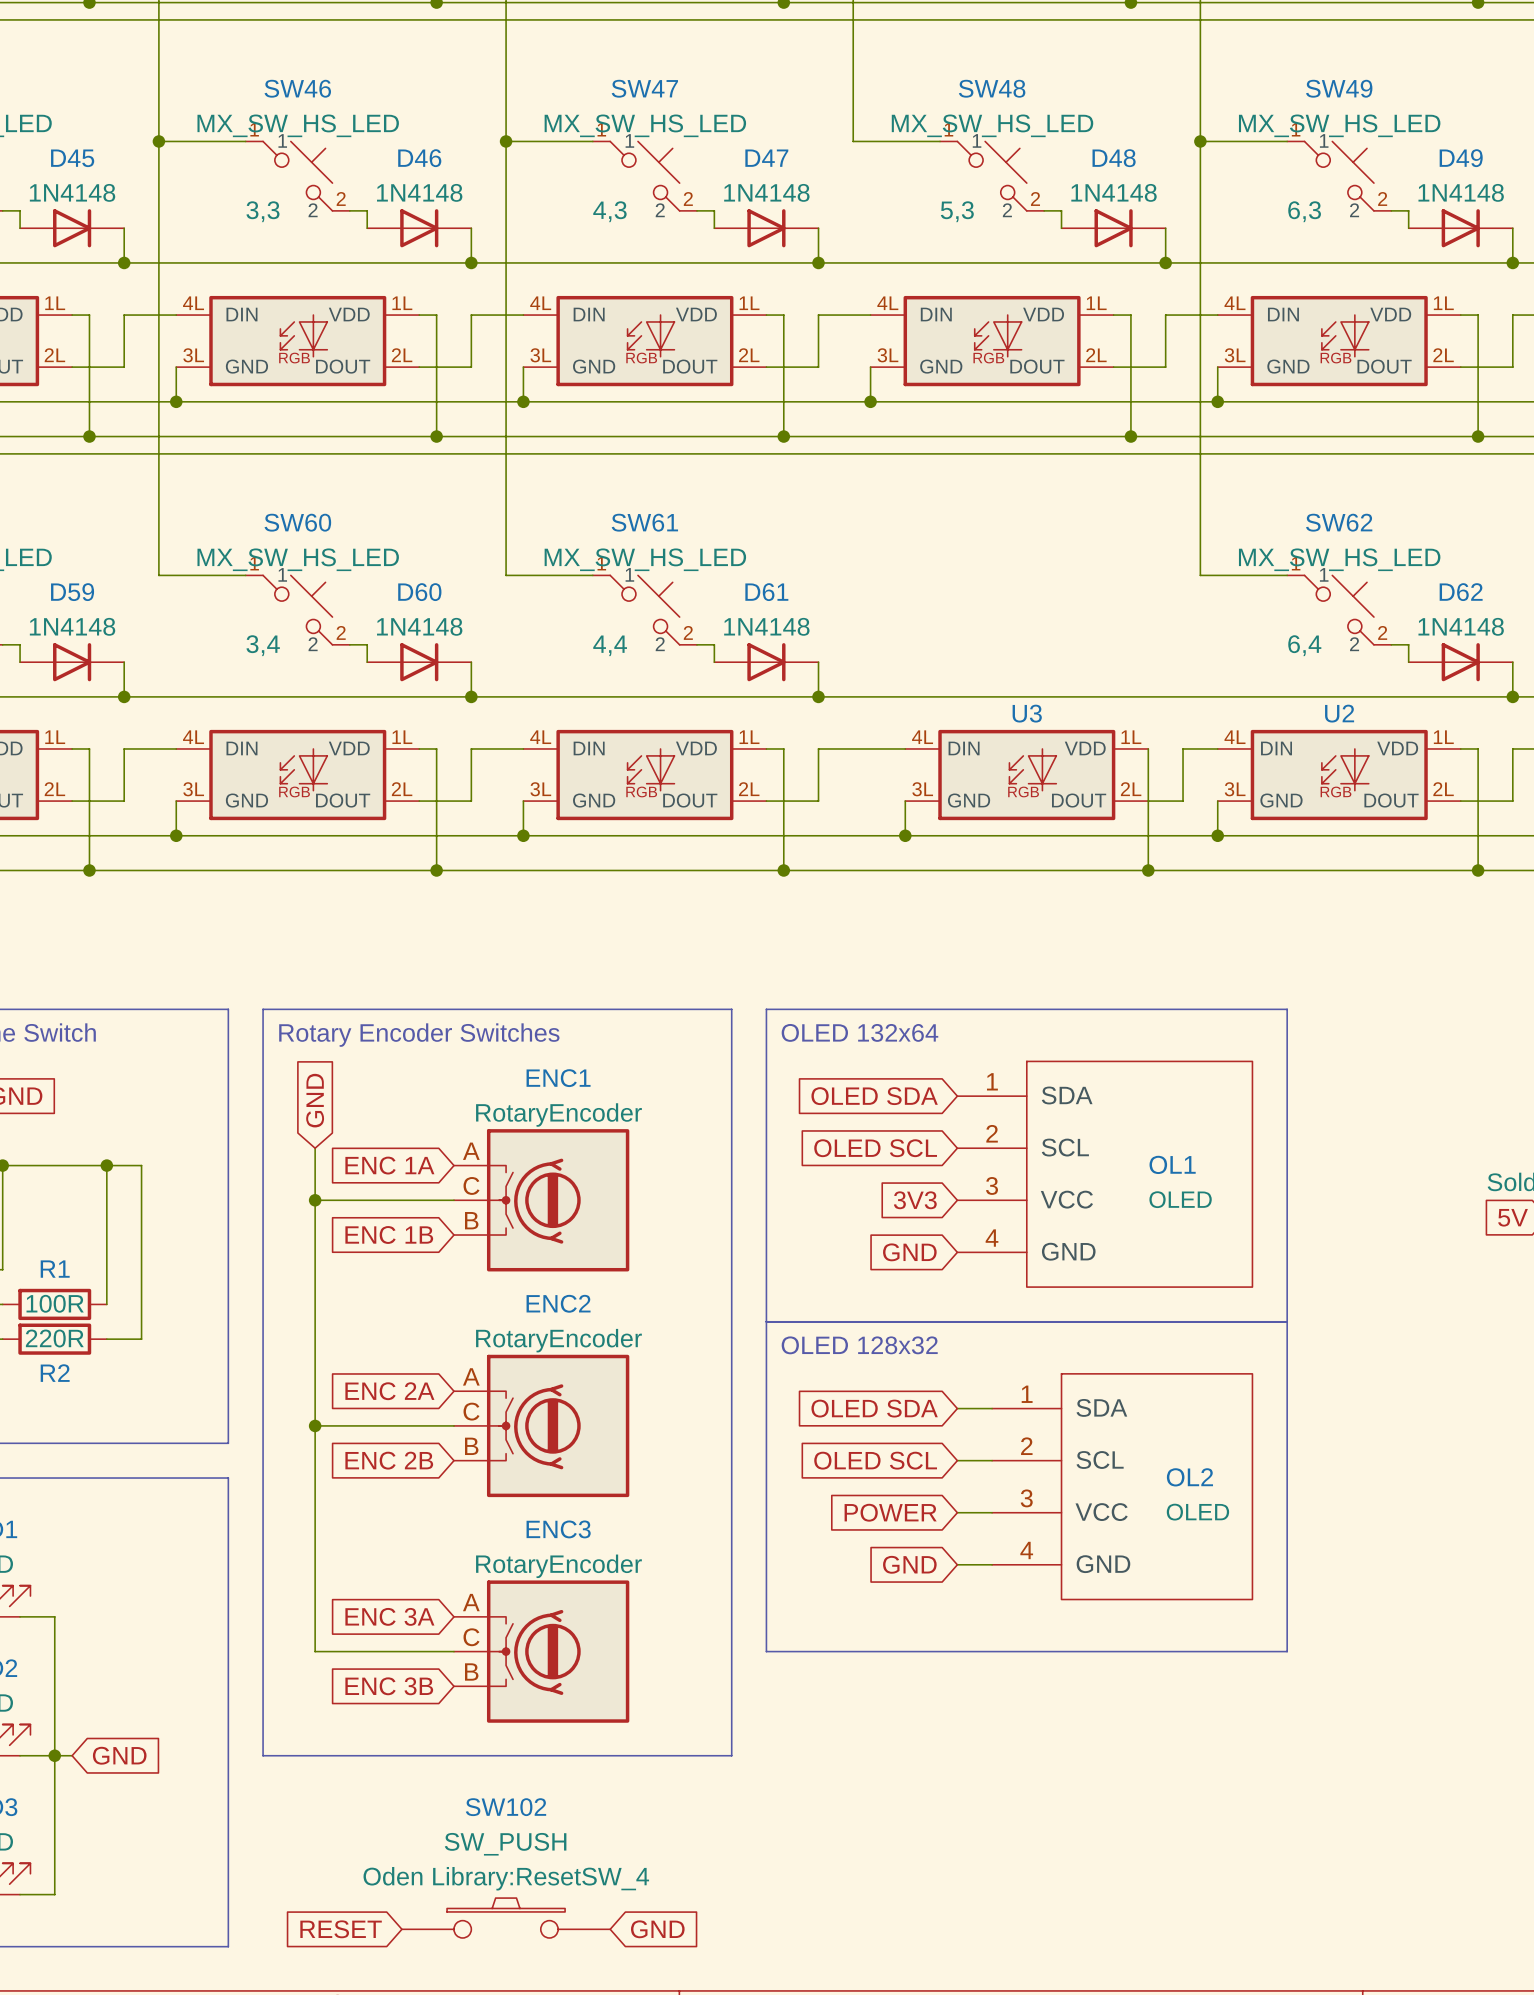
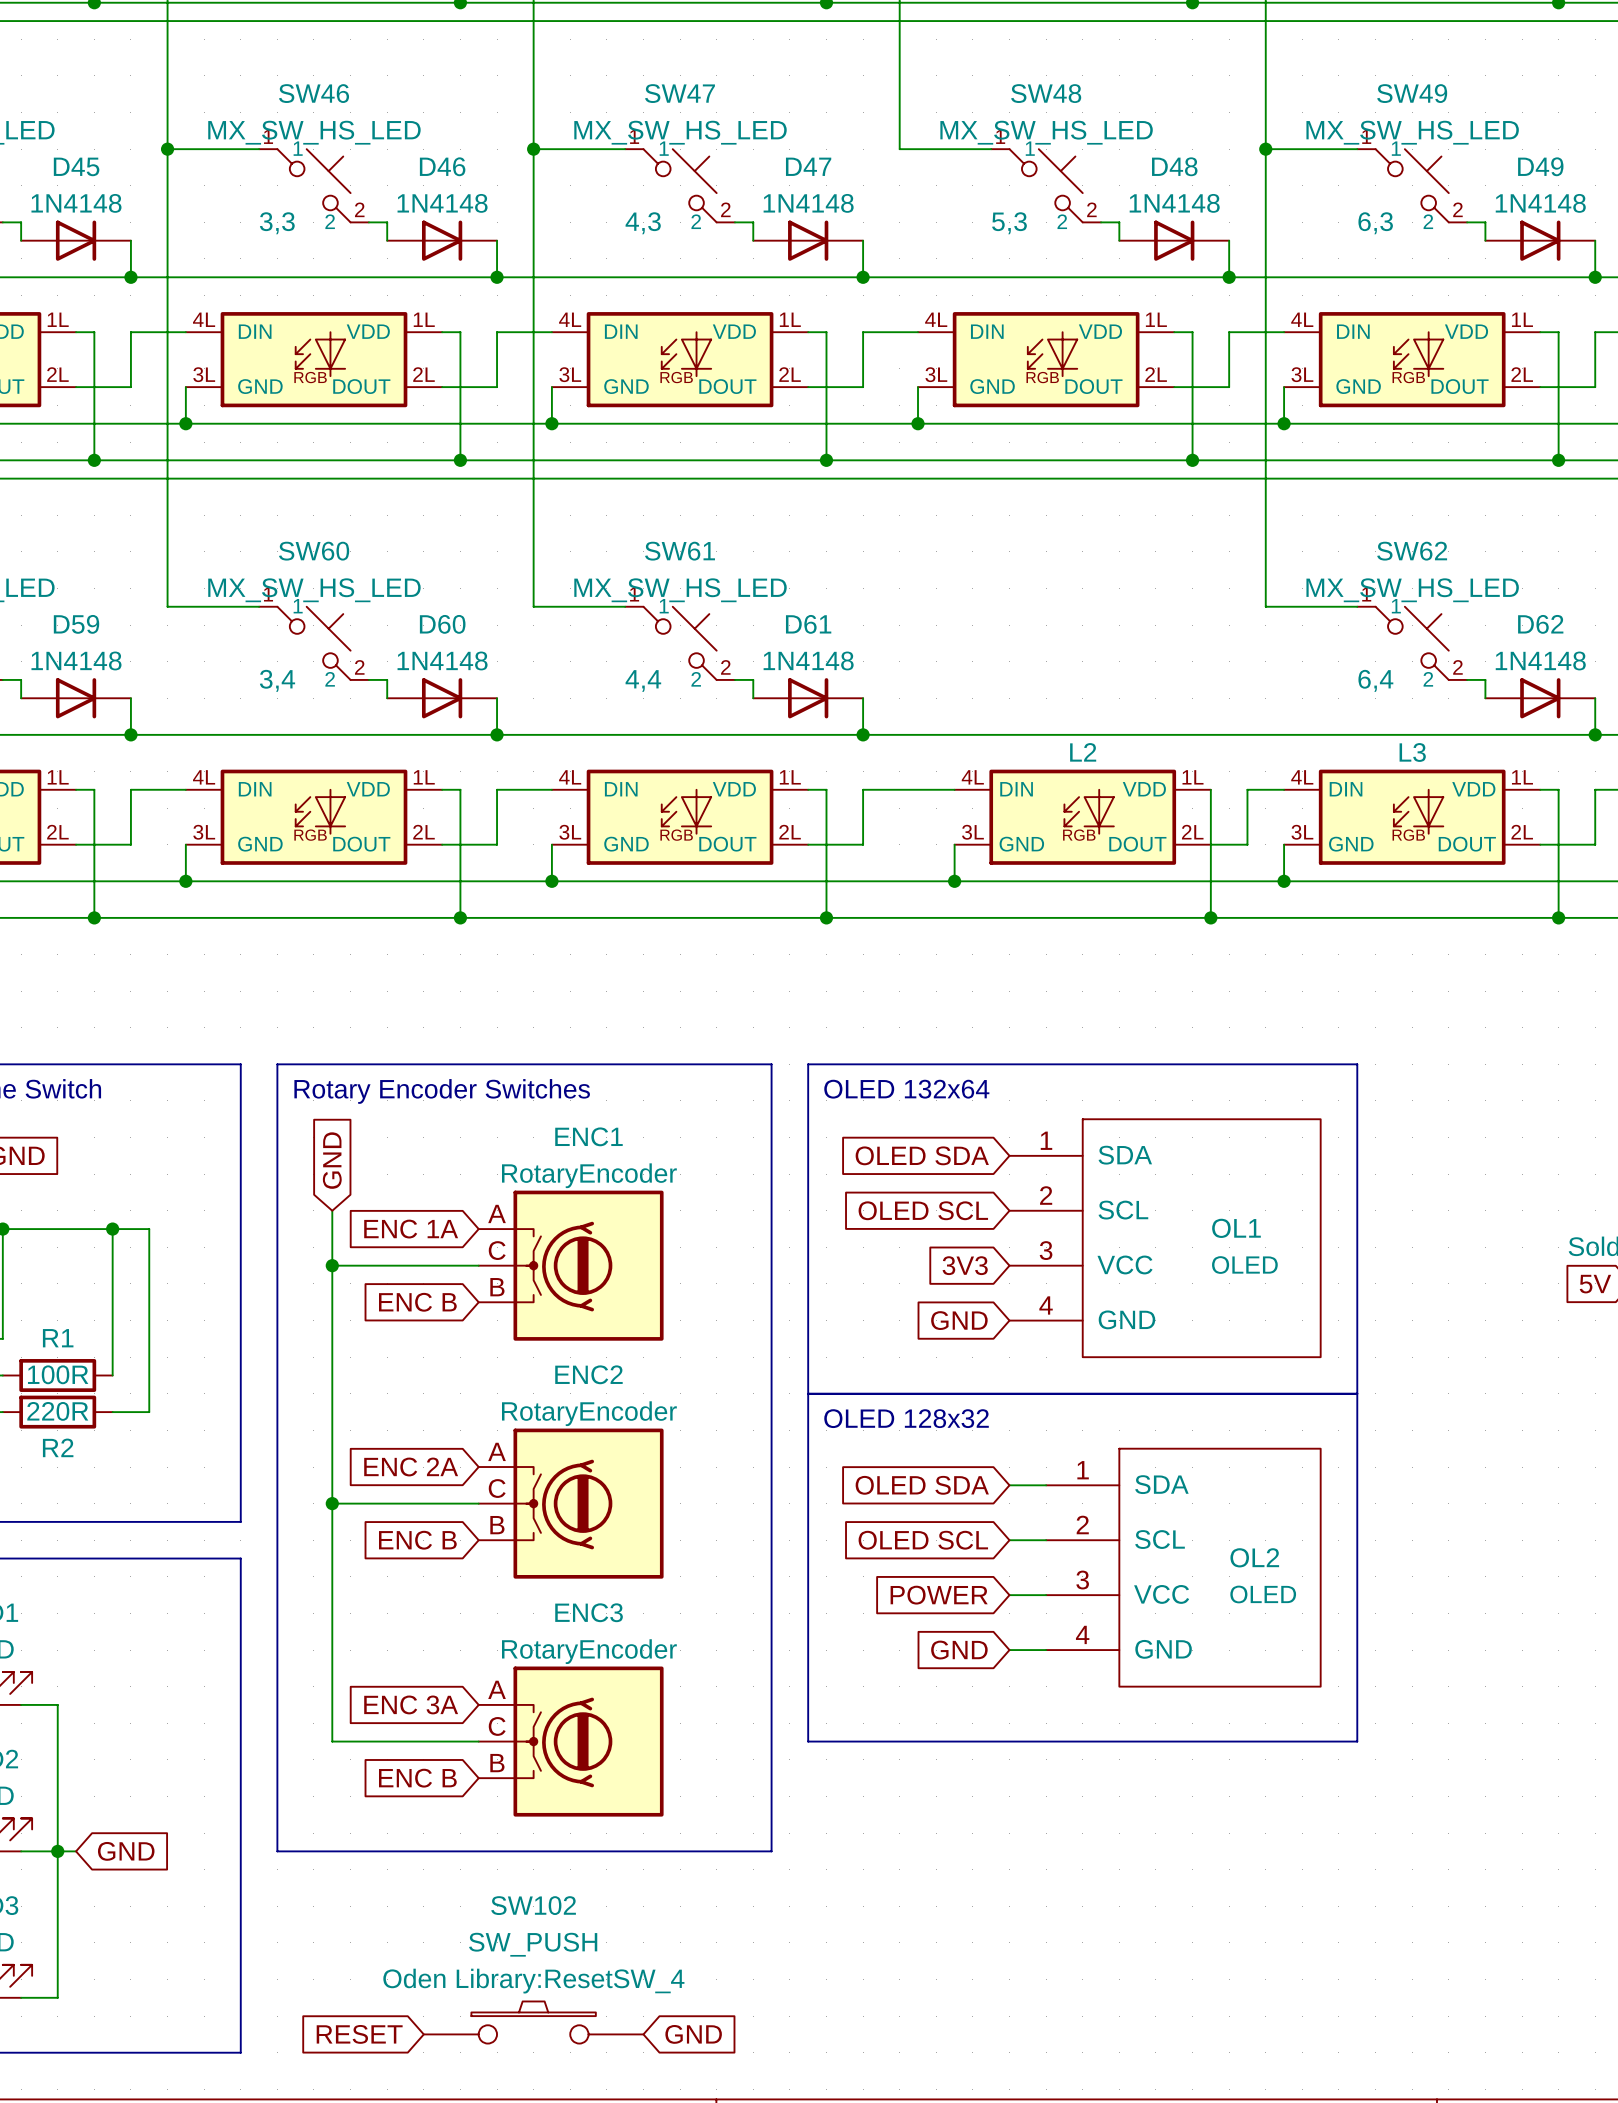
U3 name: U3 (1027, 713) -> L2 (1083, 752)
U2 name: U2 (1339, 713) -> L3 (1412, 752)
global label: ENC 1B (389, 1235) -> ENC B (417, 1302)
global label: ENC 2B (389, 1460) -> ENC B (417, 1540)
global label: ENC 3B (389, 1686) -> ENC B (417, 1778)

